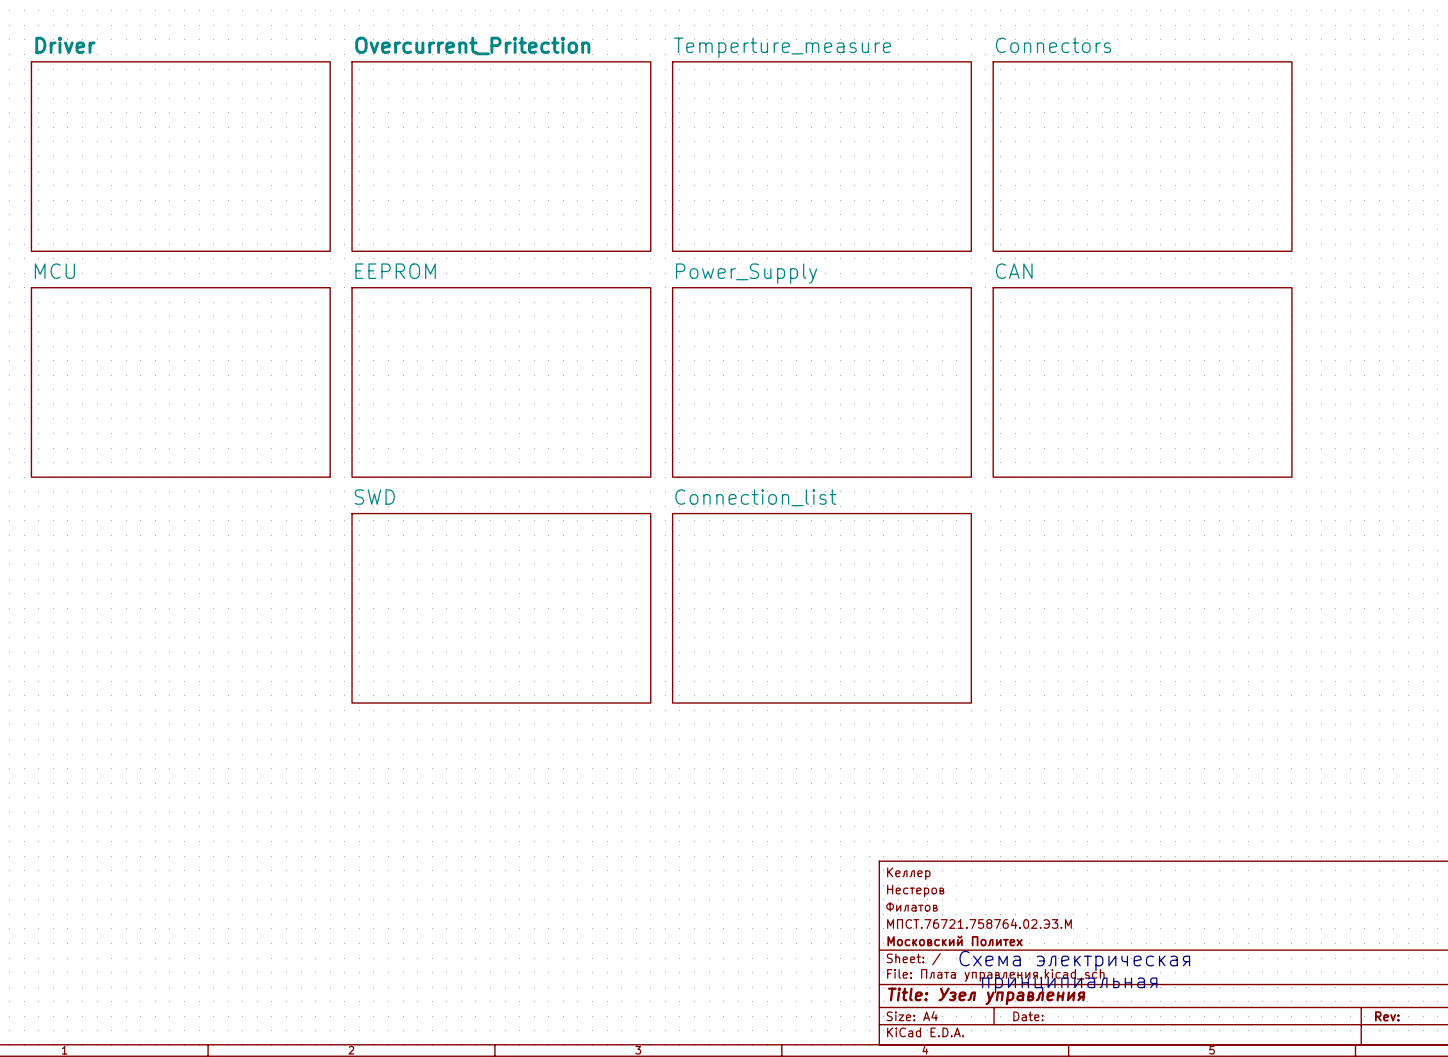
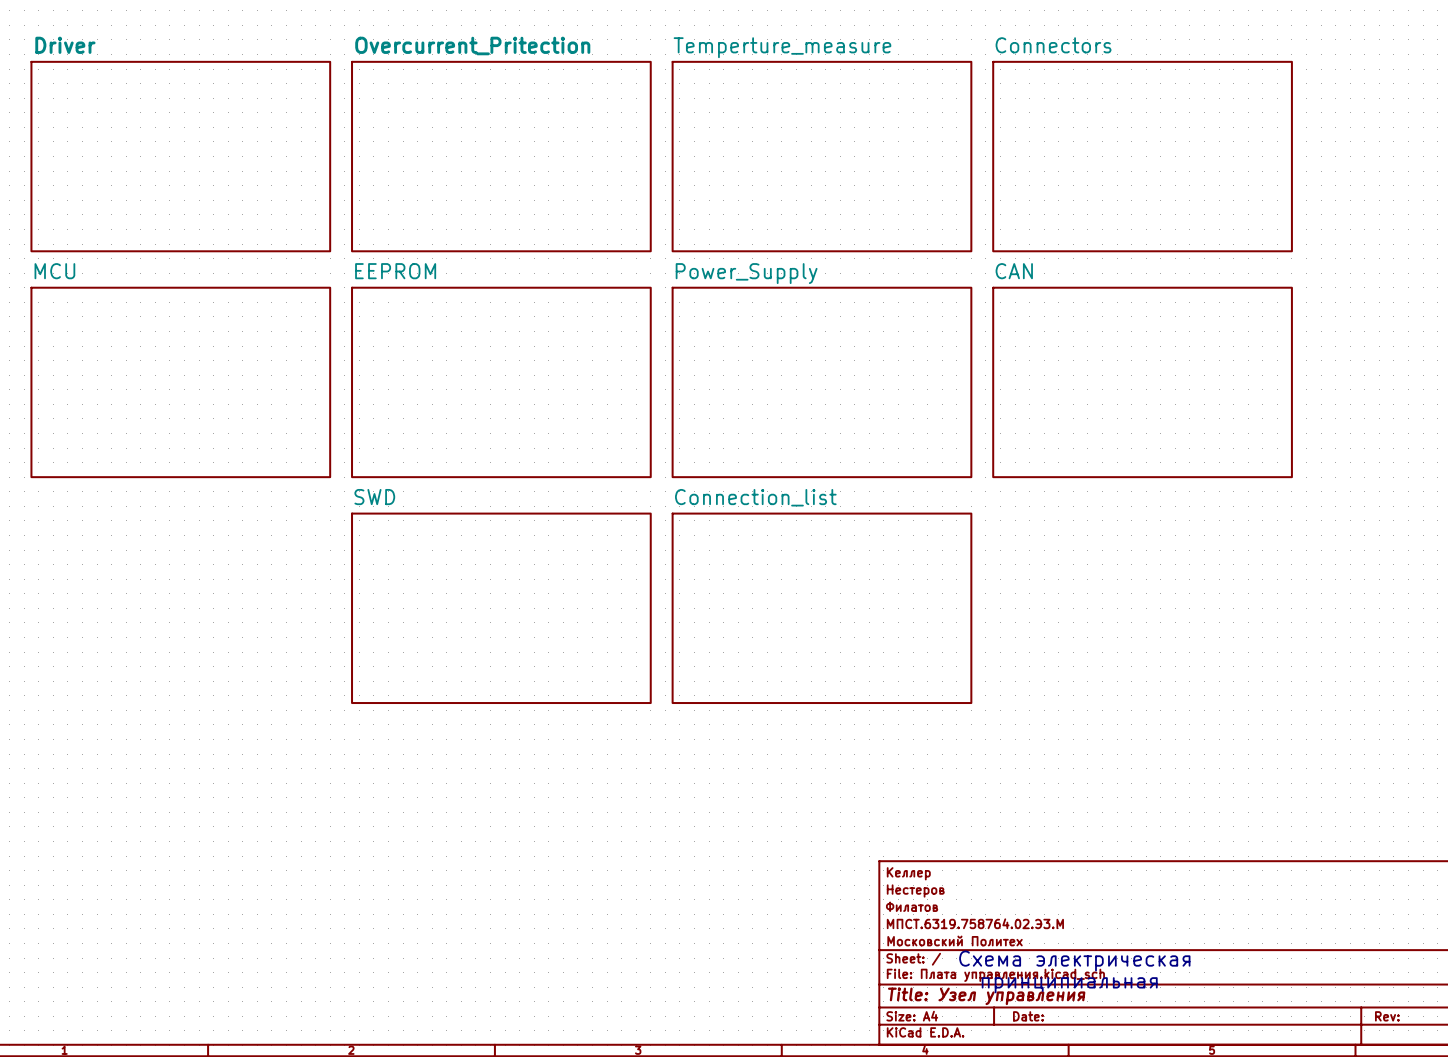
title block: МПСТ.76721.758764.02.Э3.М (979, 923) -> МПСТ.6319.758764.02.Э3.М (975, 923)

